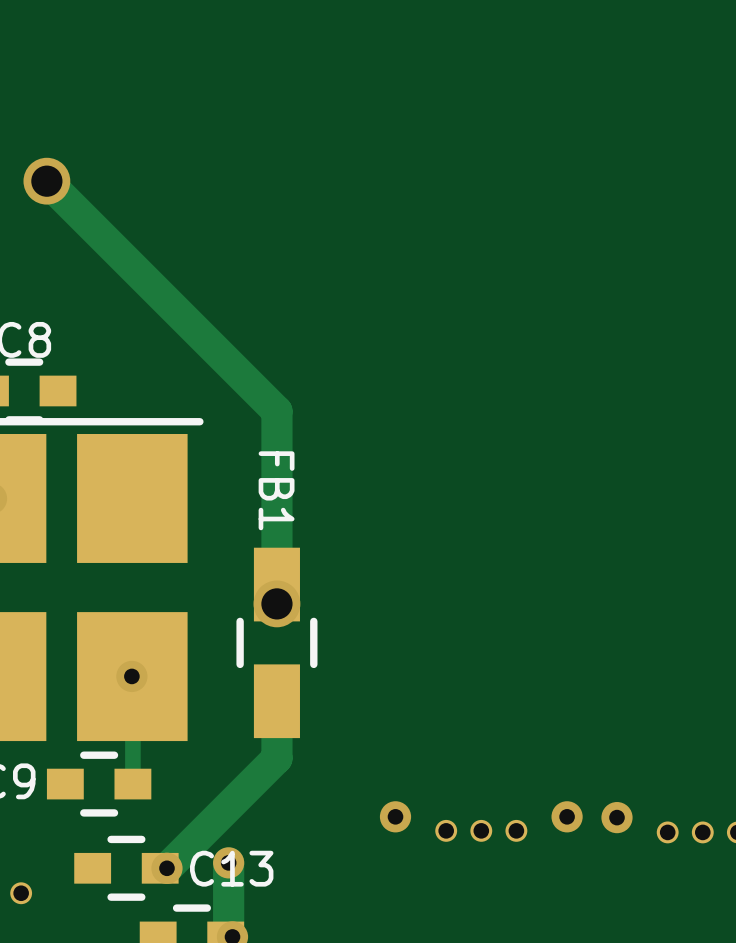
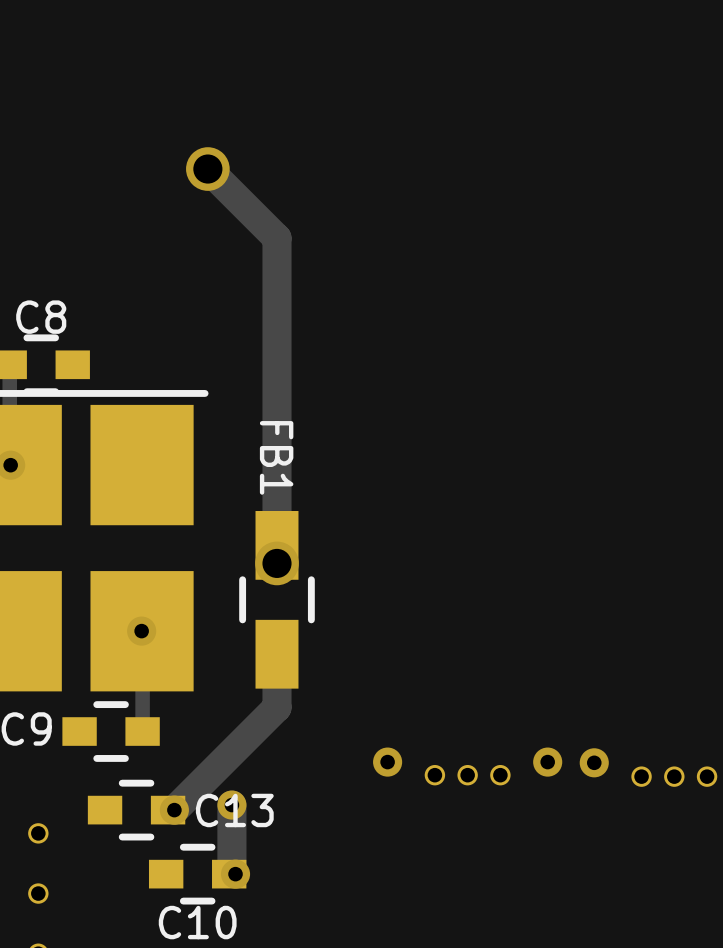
track: (46, 181) (276, 411) -> (207, 169) (277, 238) (277, 383)
via position: (46, 181) -> (207, 169)

